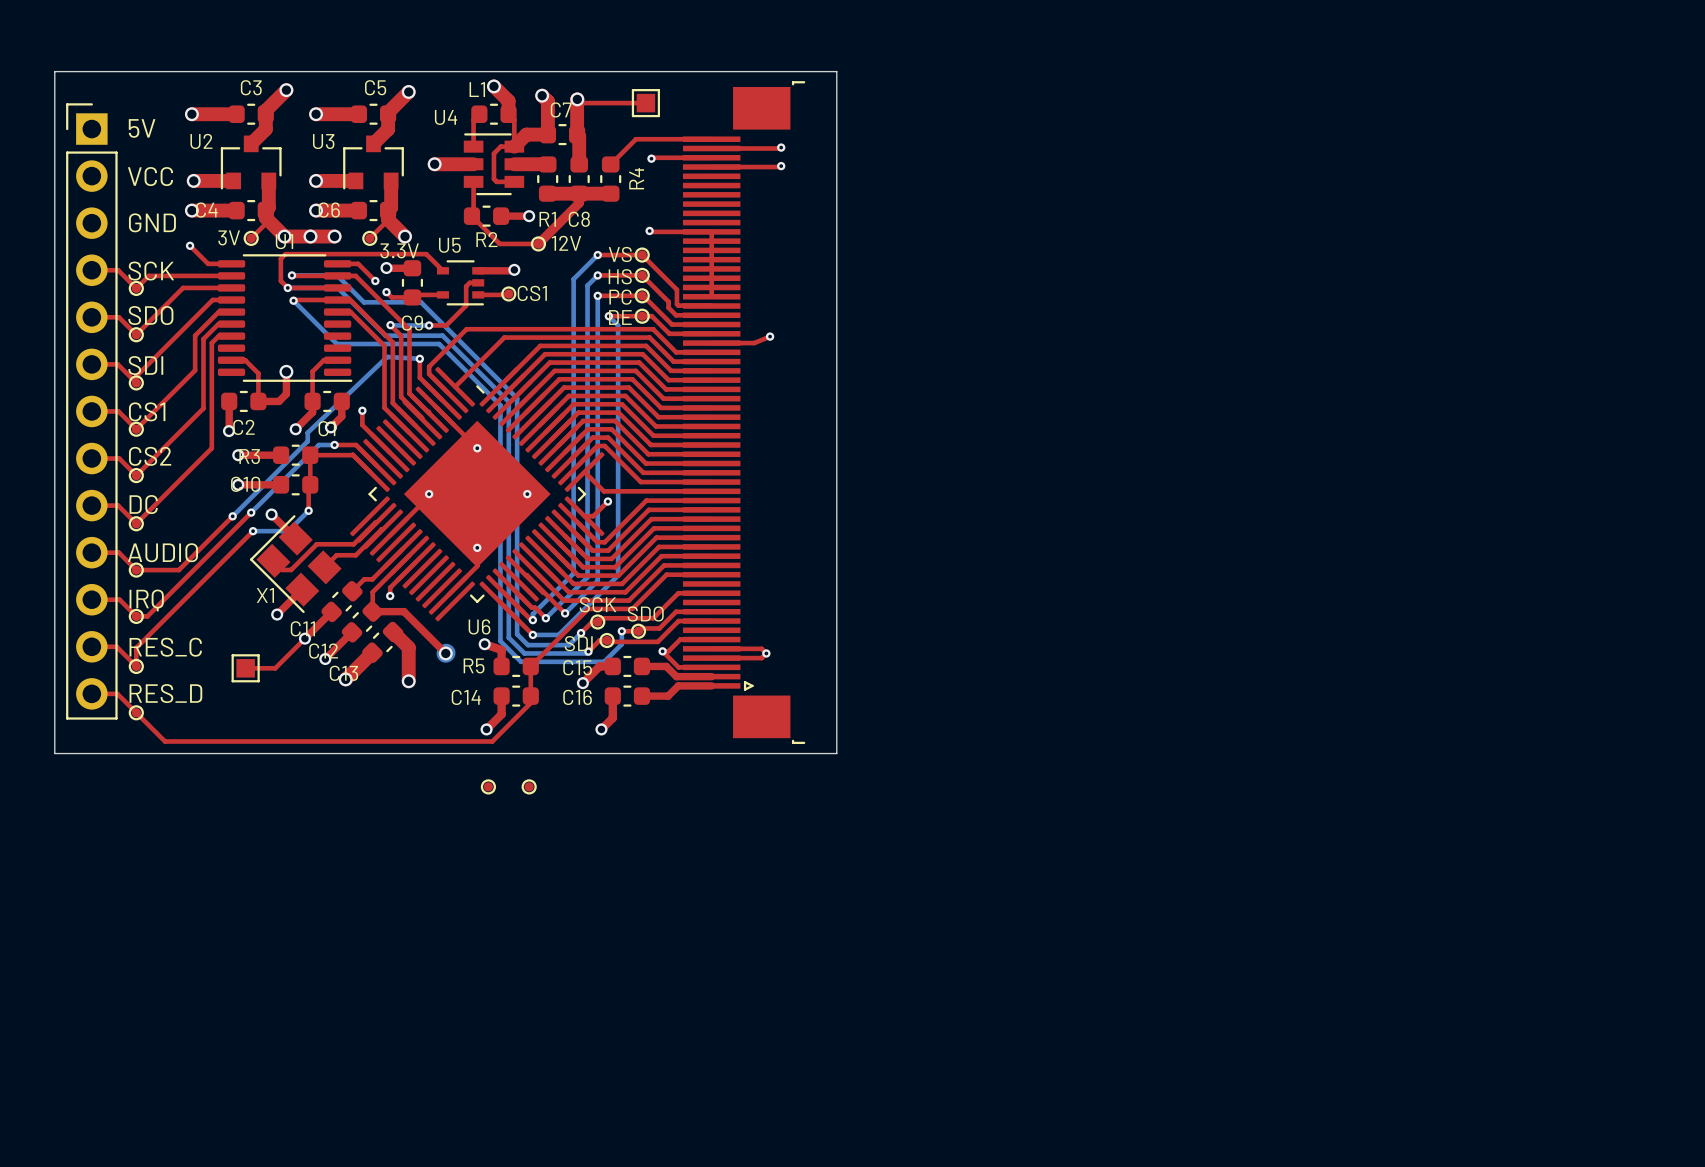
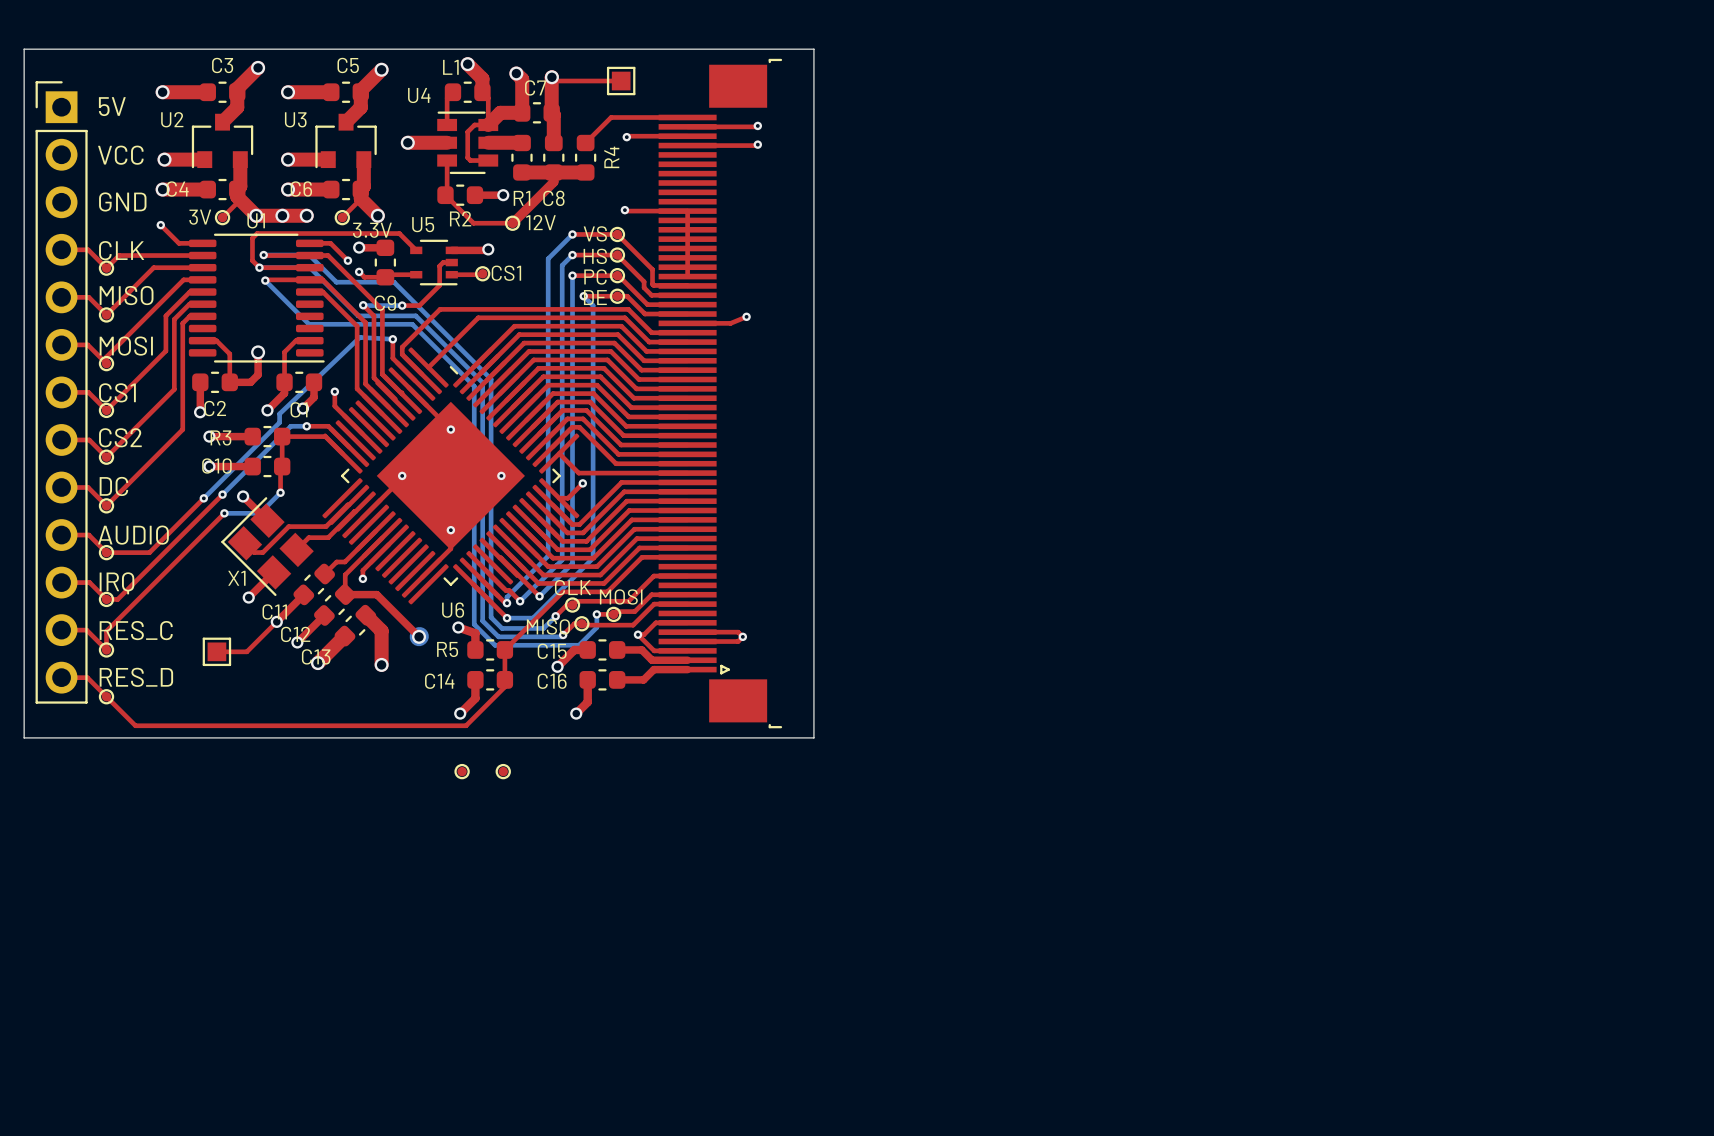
text: SCK (151, 271) -> CLK (121, 250)
text: SDO (150, 315) -> MISO (126, 295)
text: SDI (145, 365) -> MOSI (126, 346)
text: SCK (598, 604) -> CLK (572, 587)
text: SDO (645, 614) -> MOSI (621, 596)
text: SDI (578, 643) -> MISO (548, 626)

